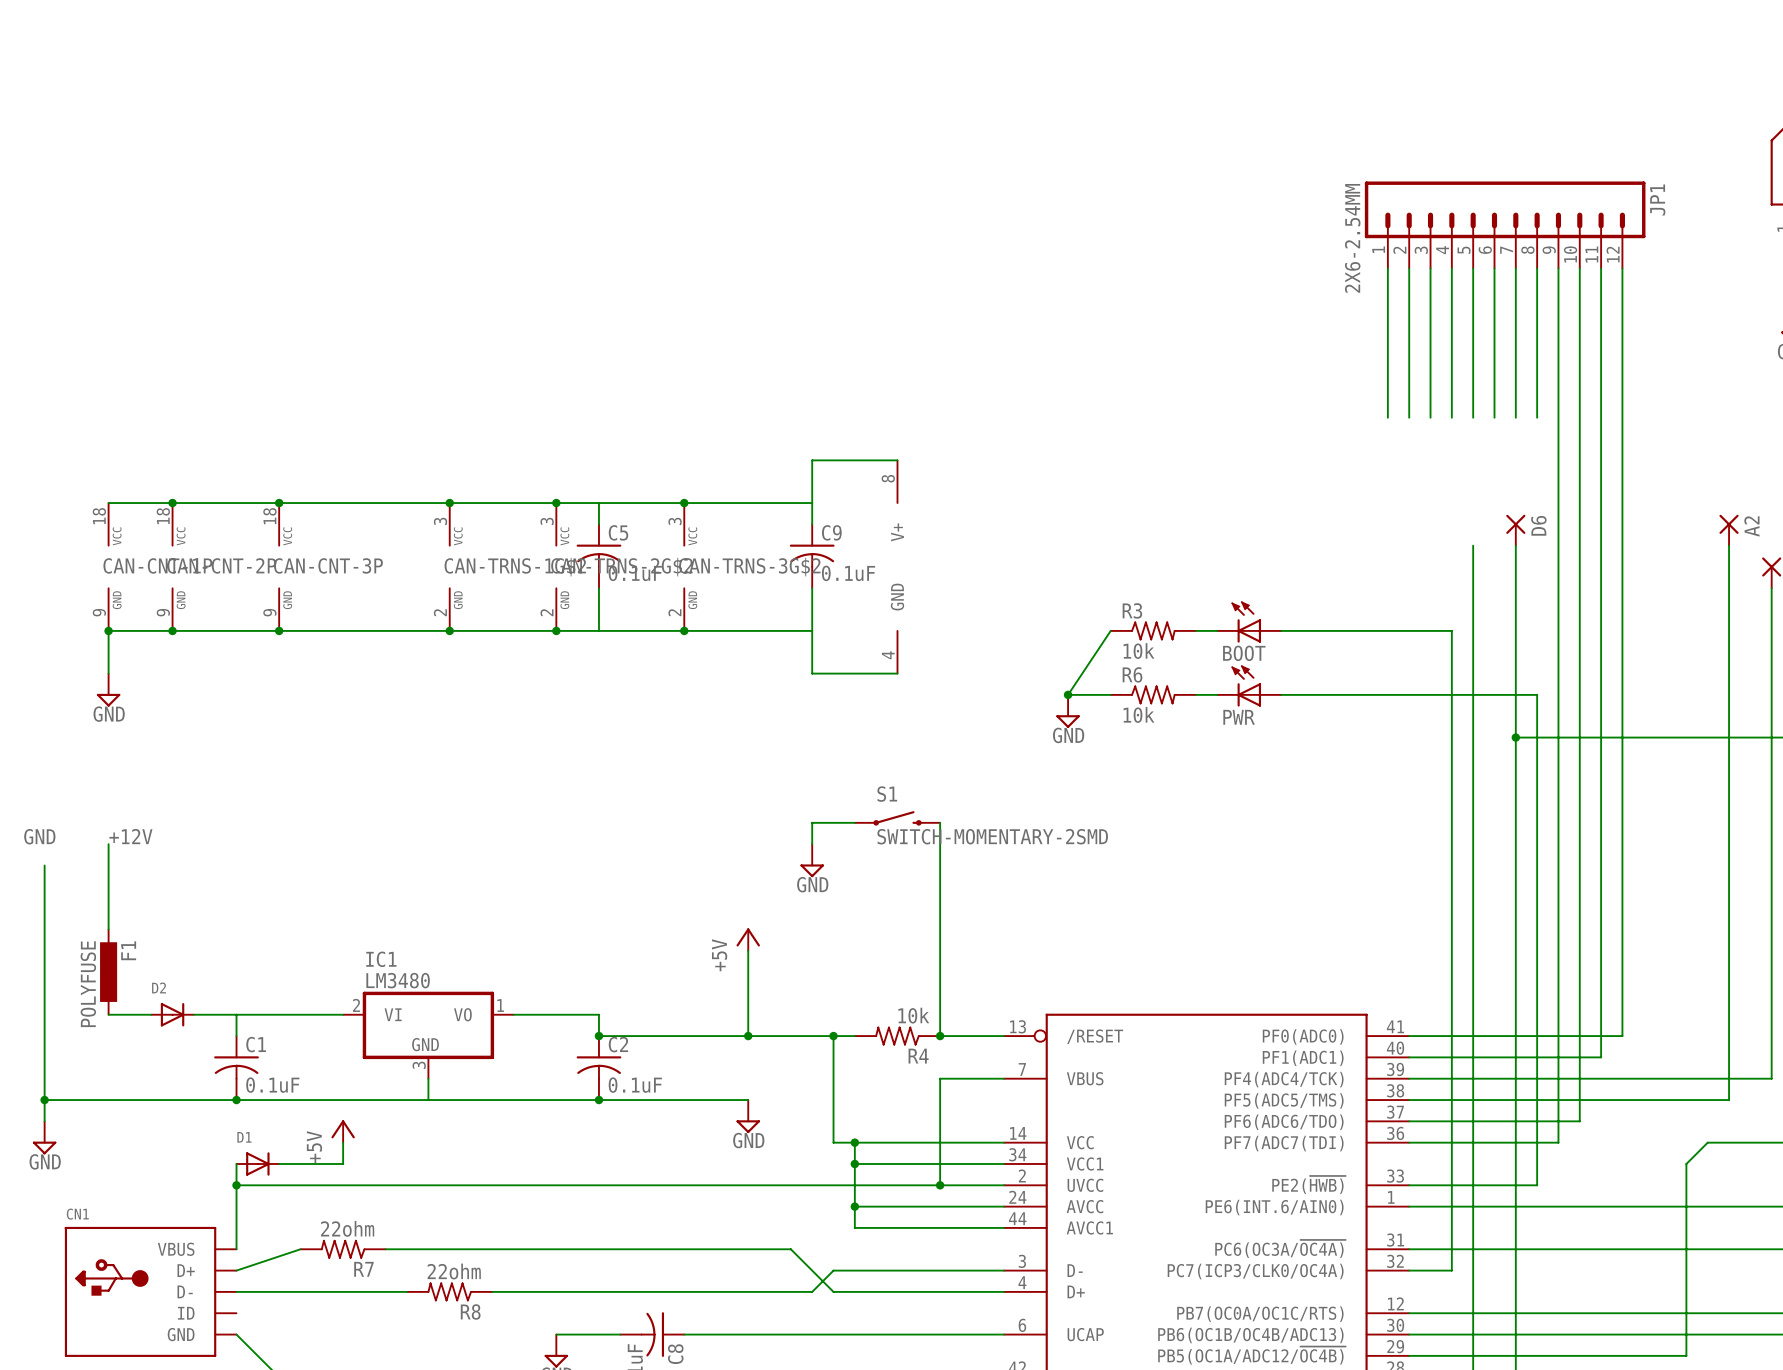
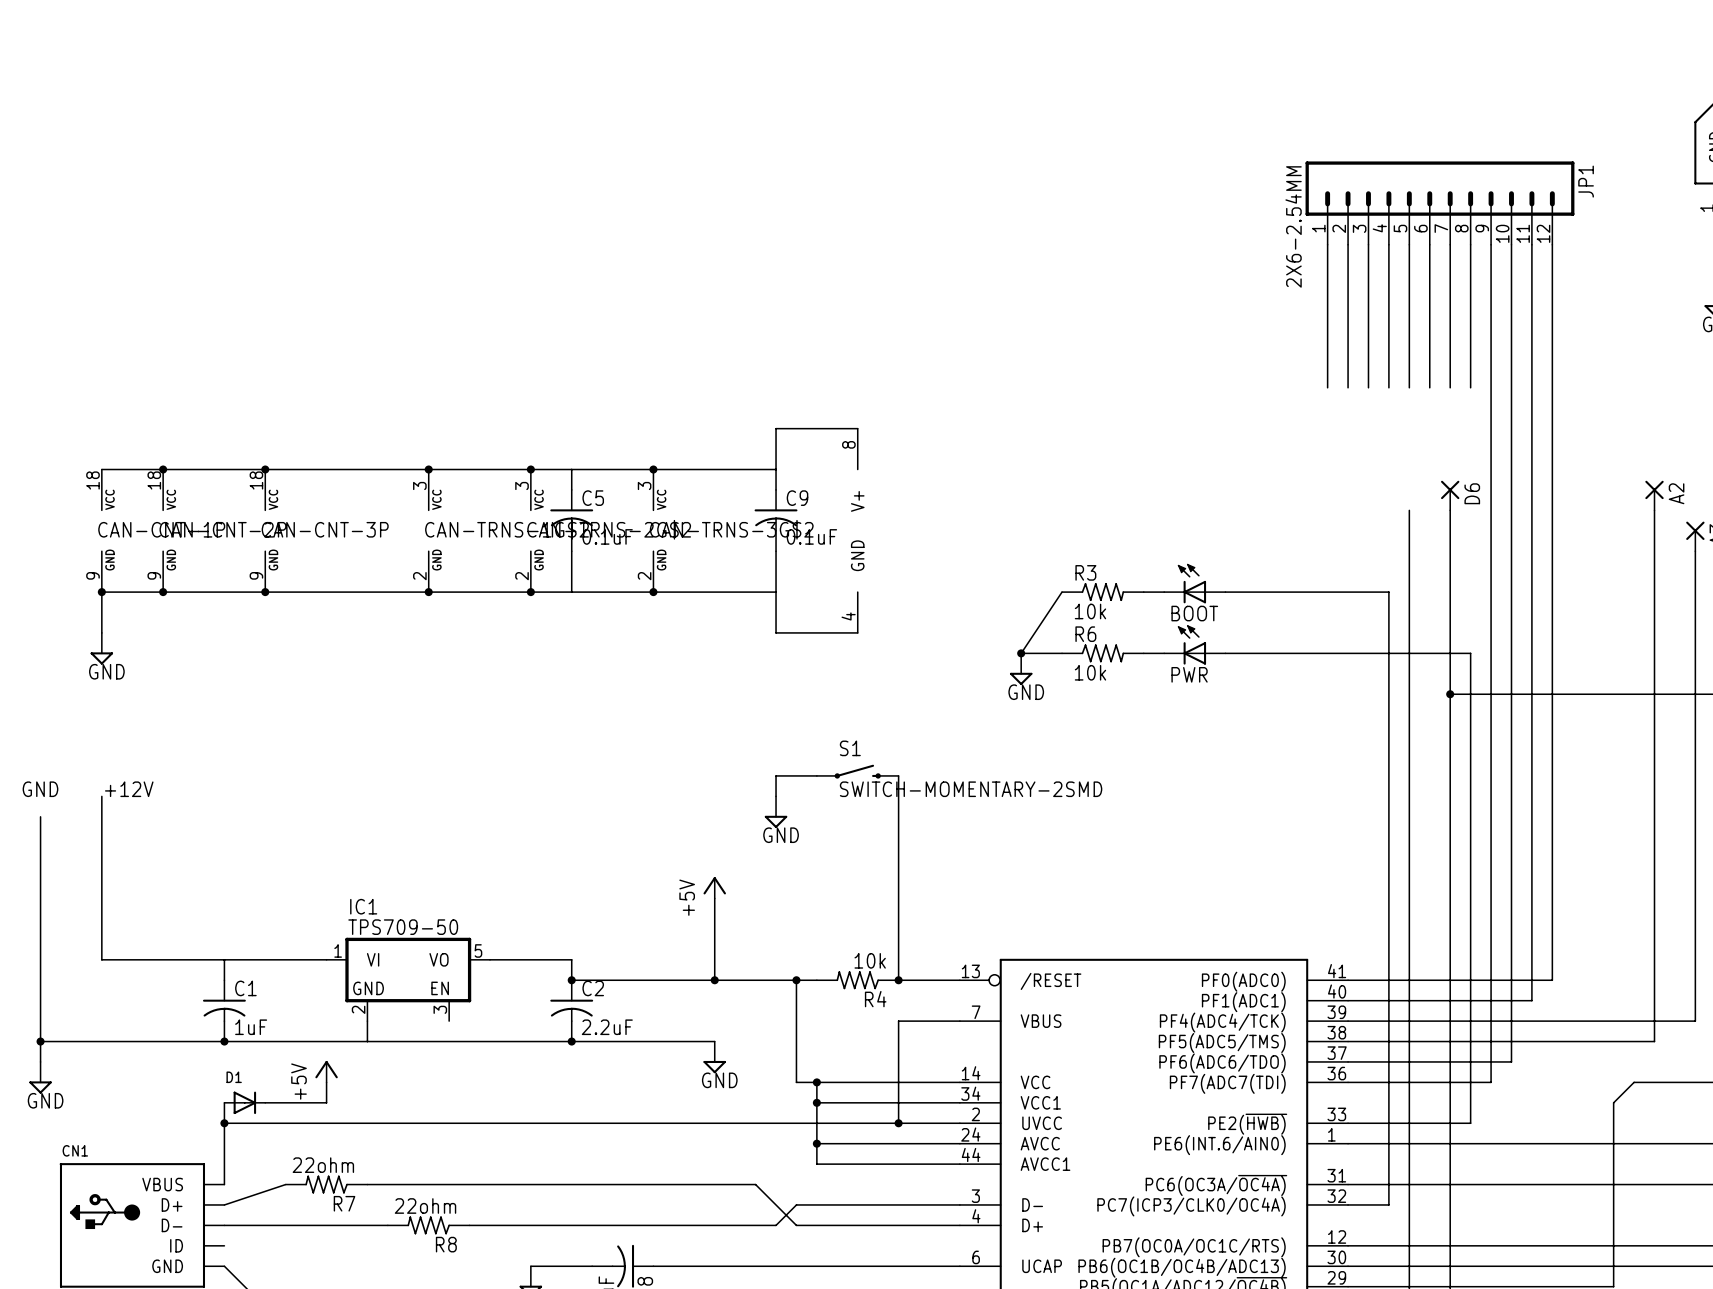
F1: POLYFUSE (108, 972) -> none
IC1 value: LM3480 (398, 980) -> TPS709-50 (403, 927)
IC1 symbol: [343, 991, 514, 1079] -> [326, 937, 491, 1022]
D2: (172, 1014) -> none
wire: (428, 1078) (428, 1100) -> (367, 1021) (367, 1041)
C1 value: 0.1uF (272, 1085) -> 1uF (251, 1027)
C2 value: 0.1uF (635, 1085) -> 2.2uF (607, 1027)

